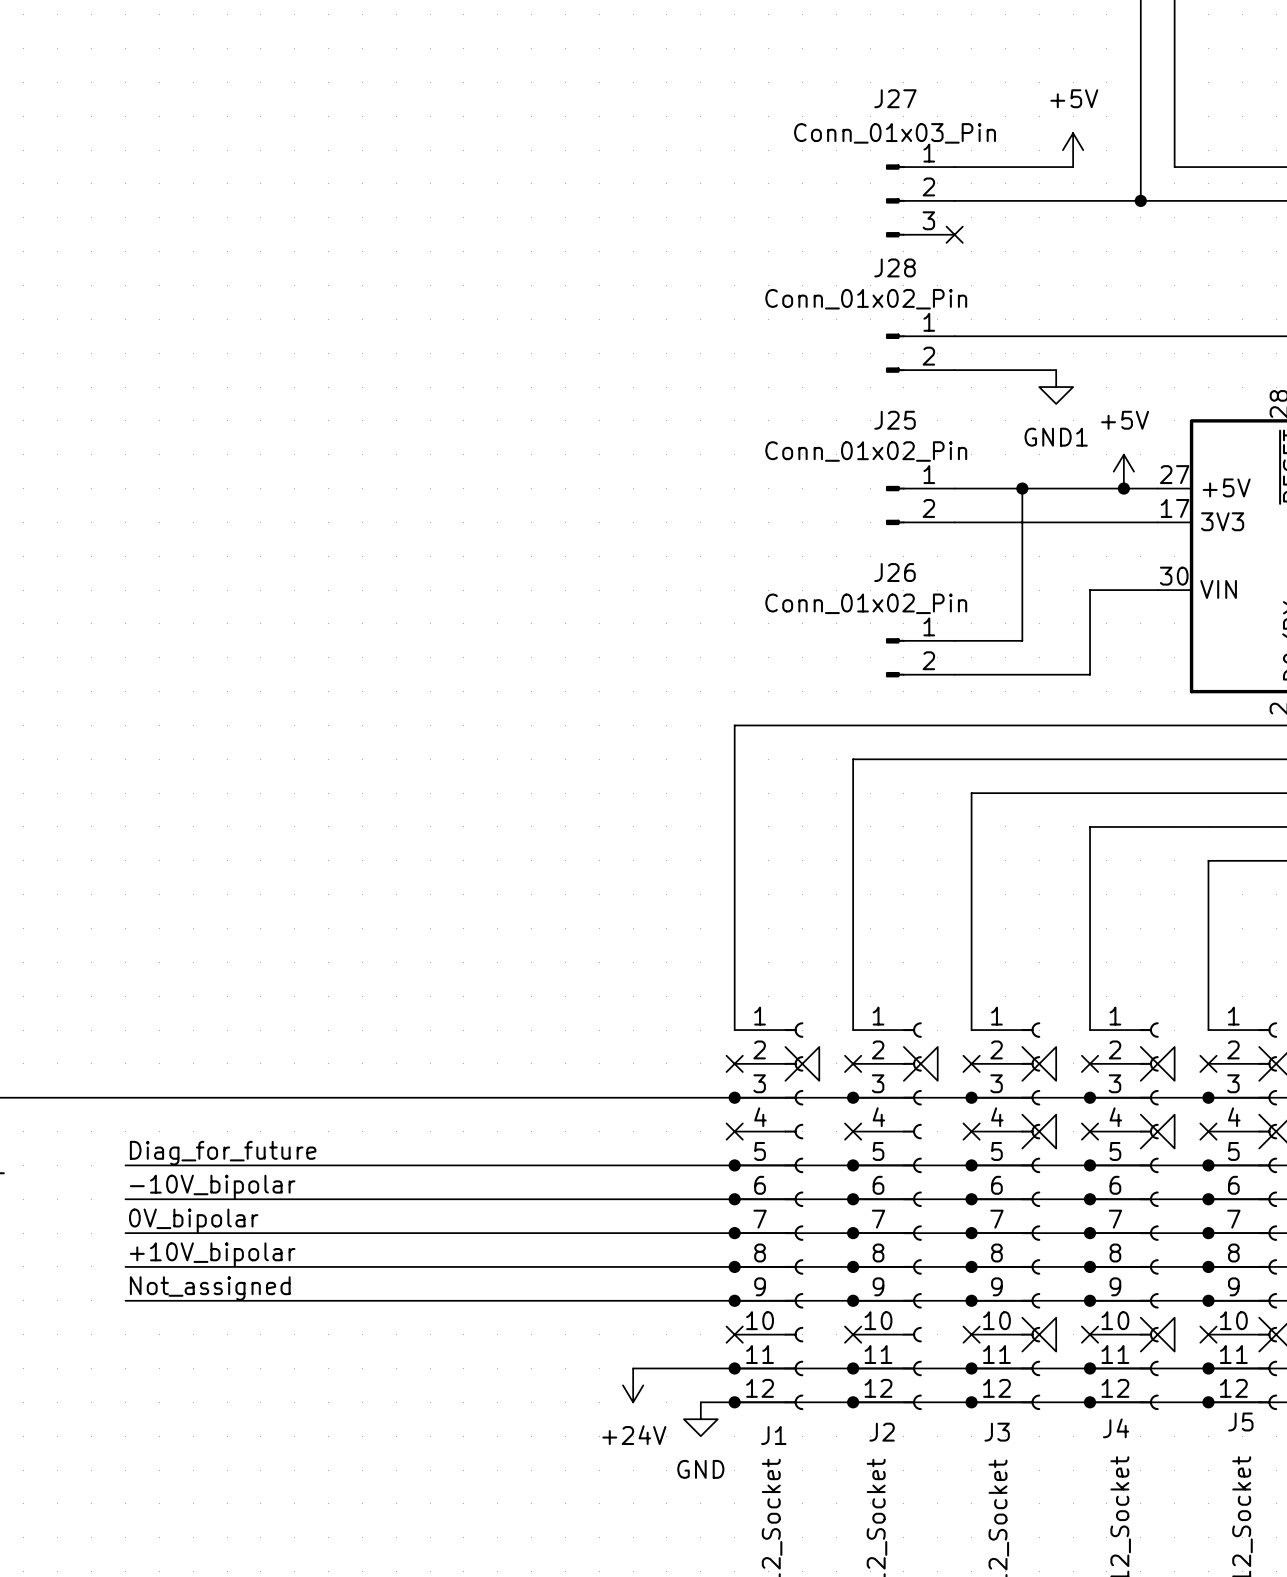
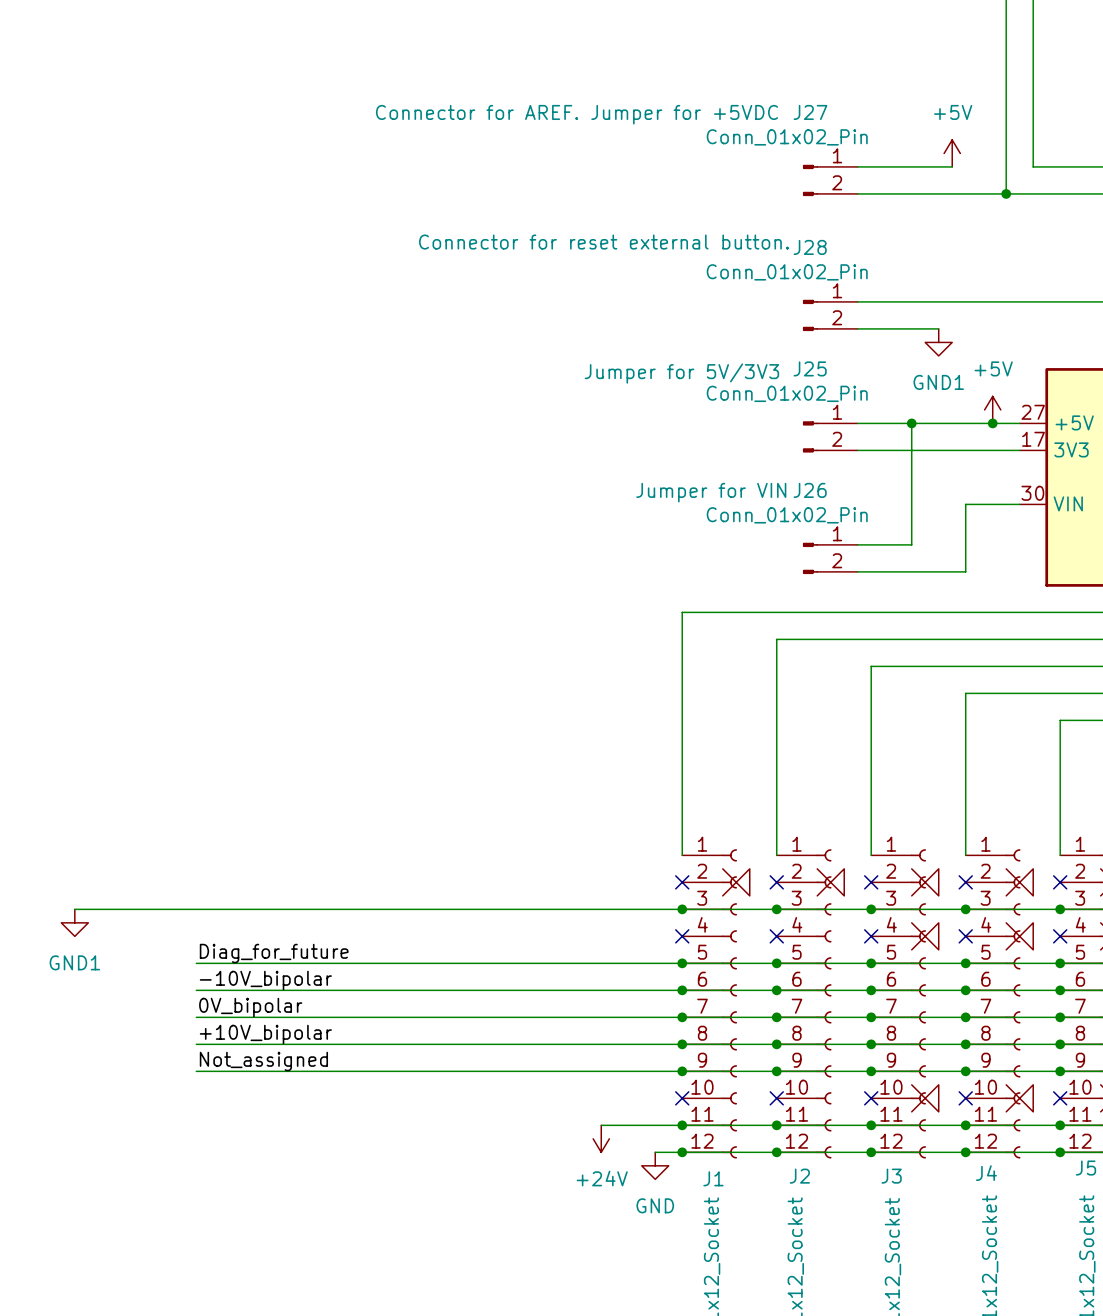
J27 text: none -> Connector for AREF. Jumper for +5VDC (576, 114)
J27 value: Conn_01x03_Pin (895, 133) -> Conn_01x02_Pin (787, 137)
J27 symbol: [885, 164, 955, 238] -> [802, 164, 858, 197]
no-connect mark: (954, 234) -> none
J28 text: none -> Connector for reset external button. (603, 242)
J25 text: none -> Jumper for 5V/3V3 (681, 373)
J26 text: none -> Jumper for VIN (711, 492)

